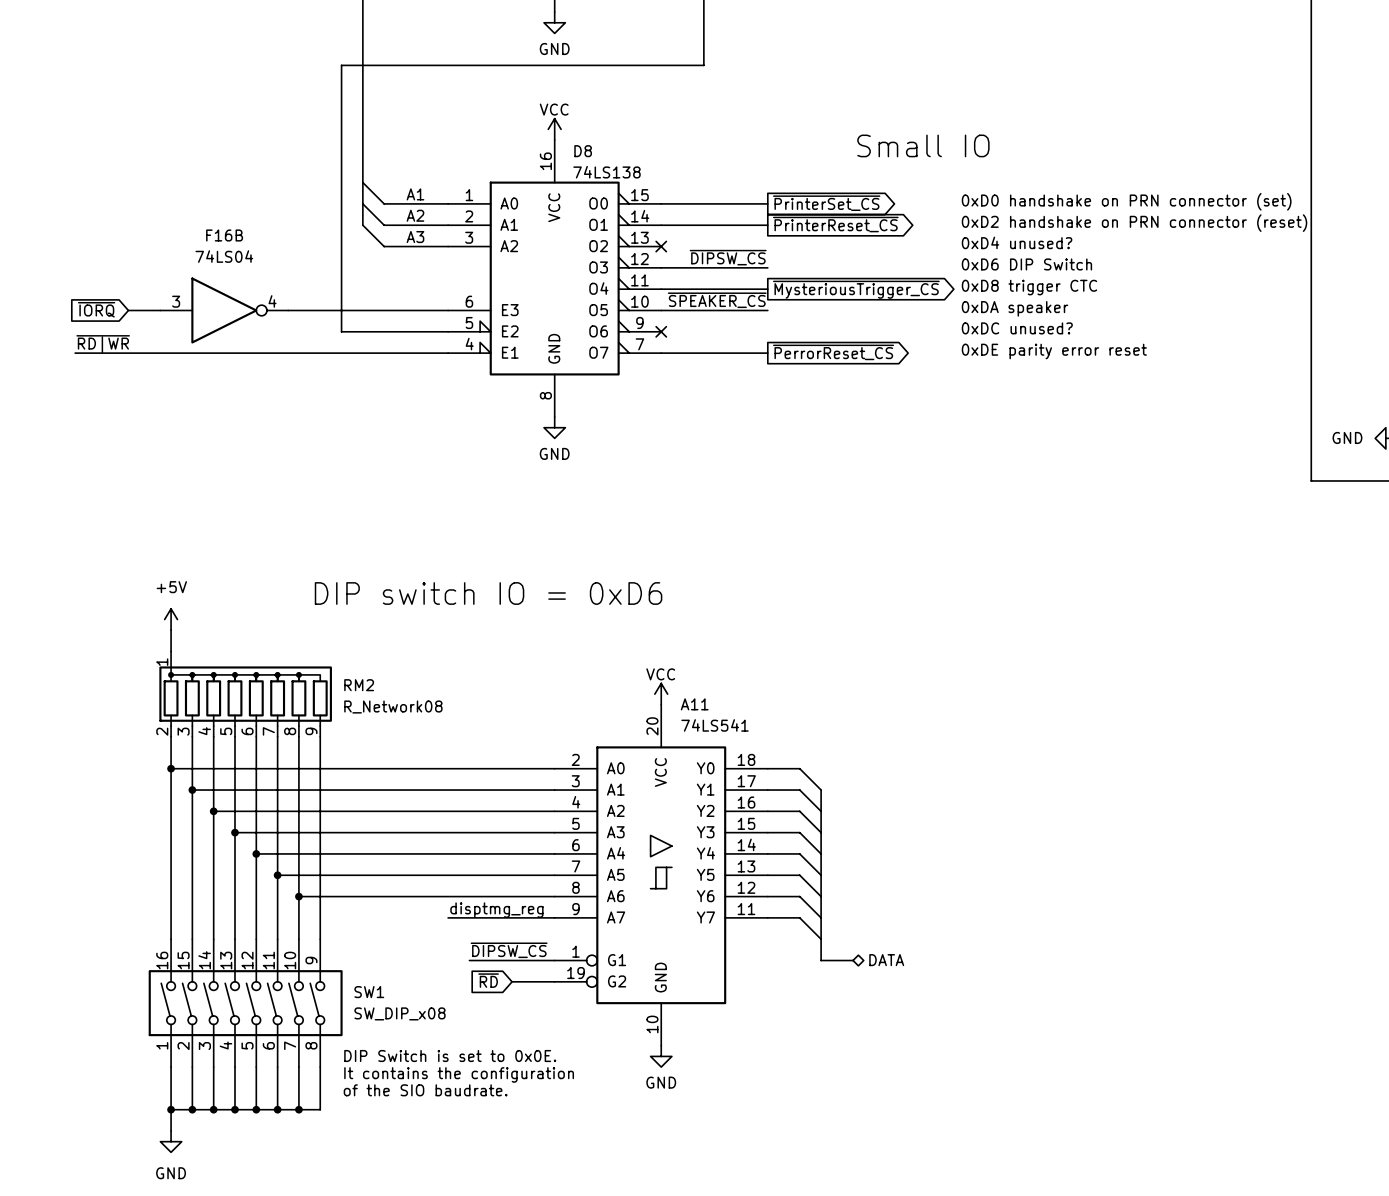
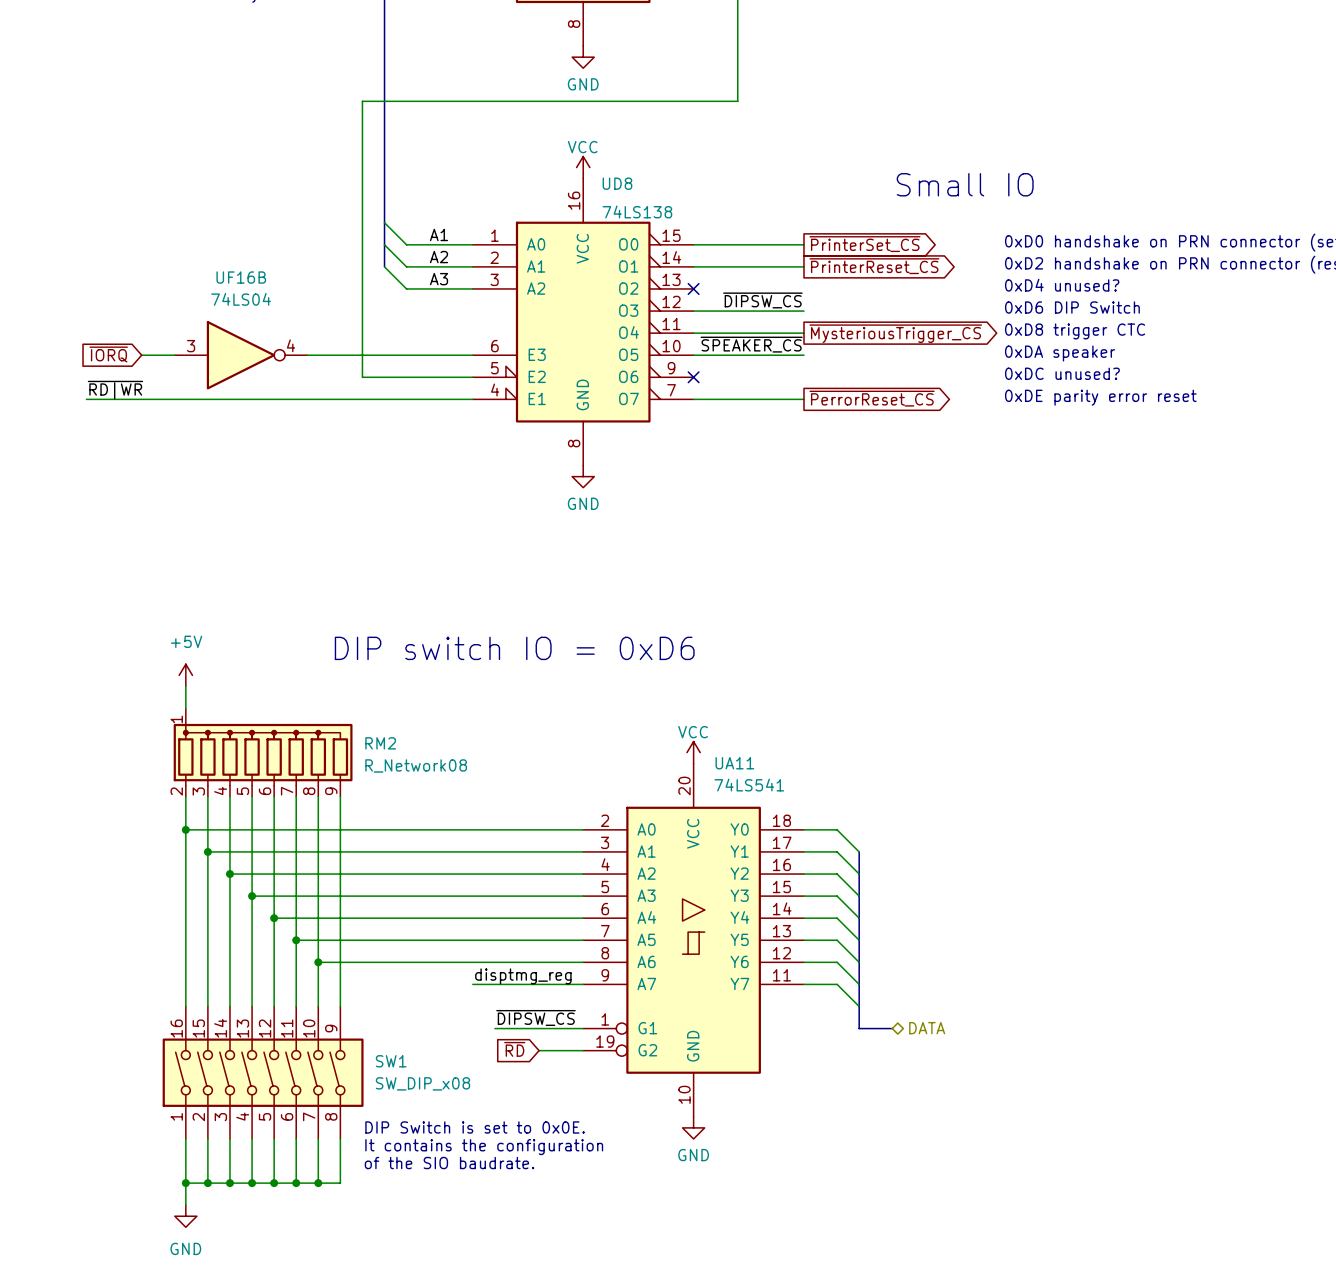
D8 name: D8 (583, 151) -> UD8 (617, 183)
F16B name: F16B (224, 235) -> UF16B (241, 277)
A11 name: A11 (694, 704) -> UA11 (734, 763)

